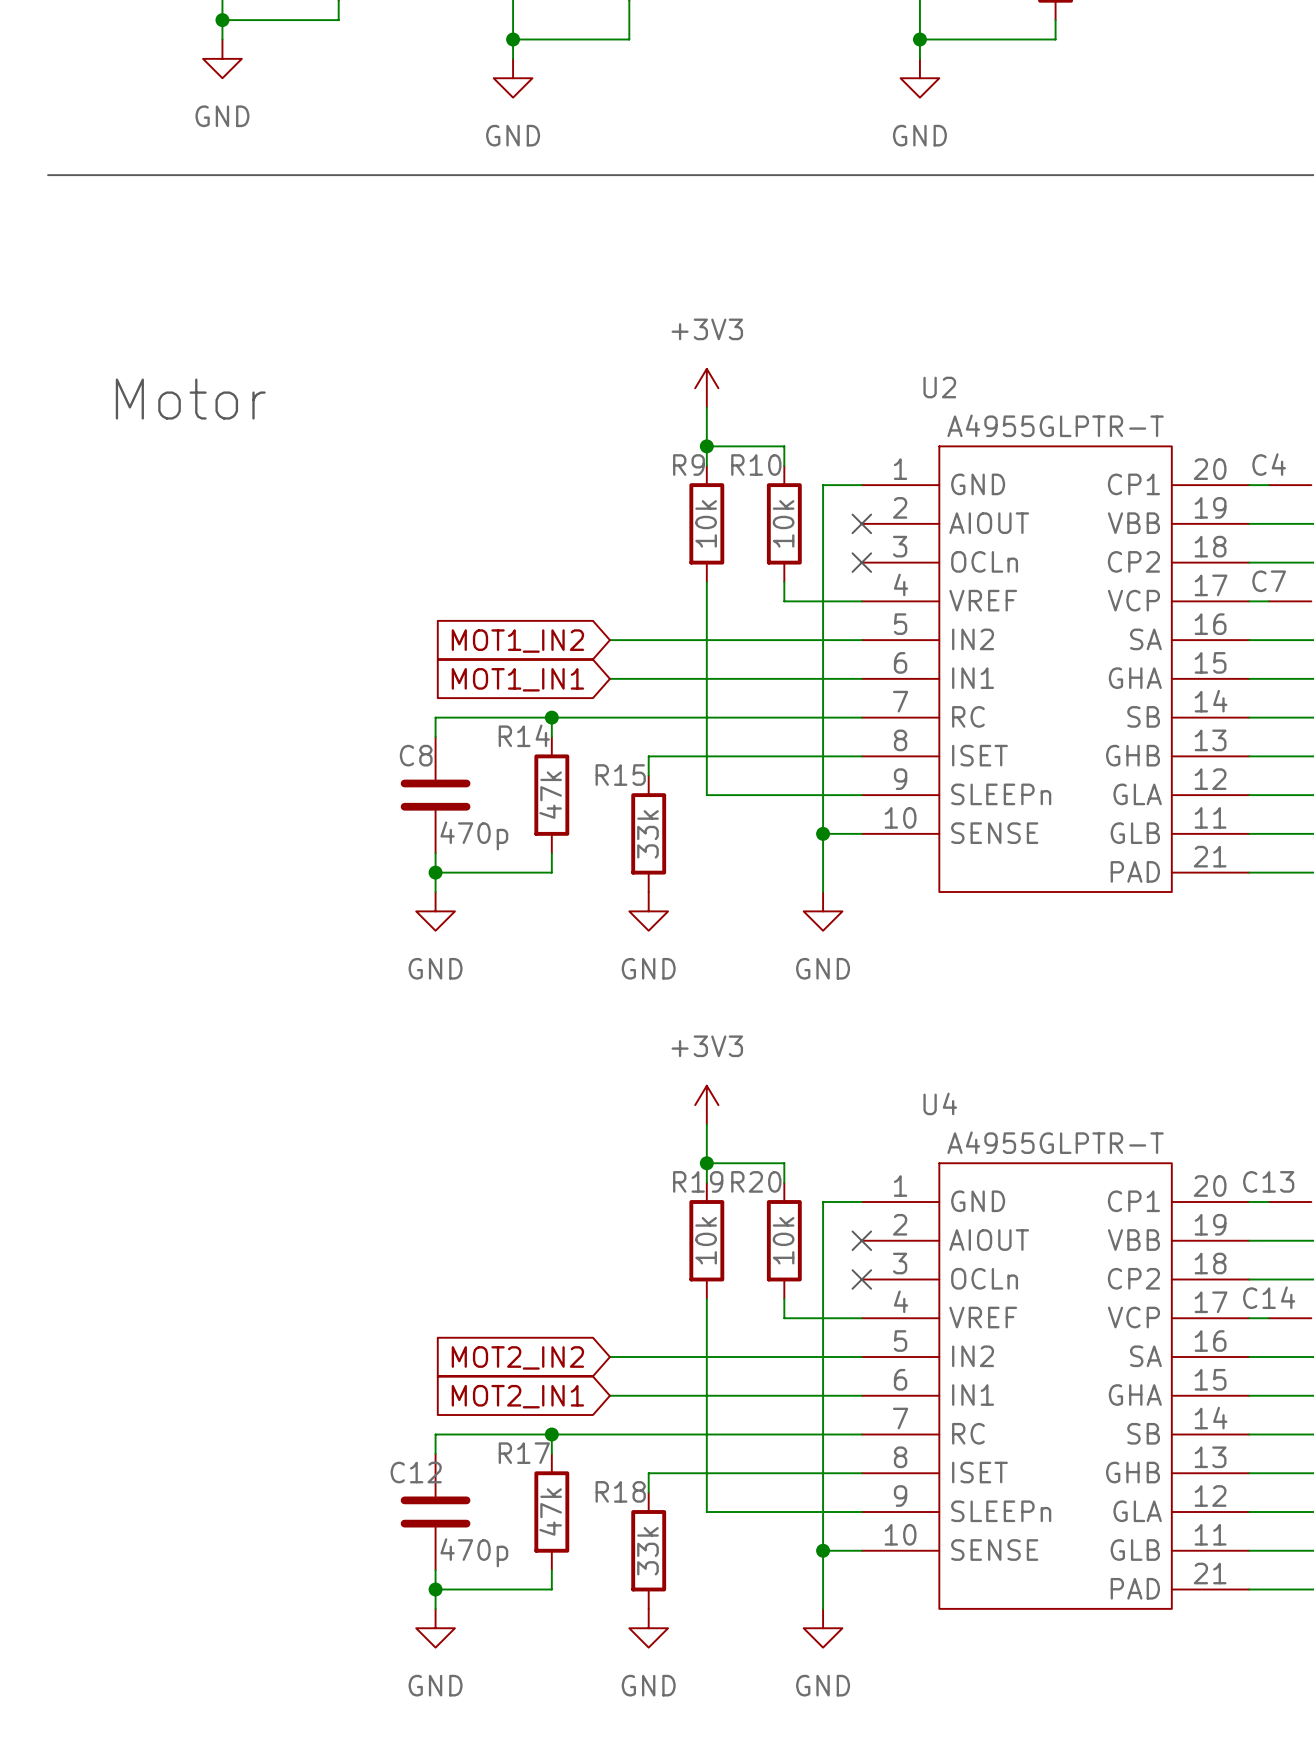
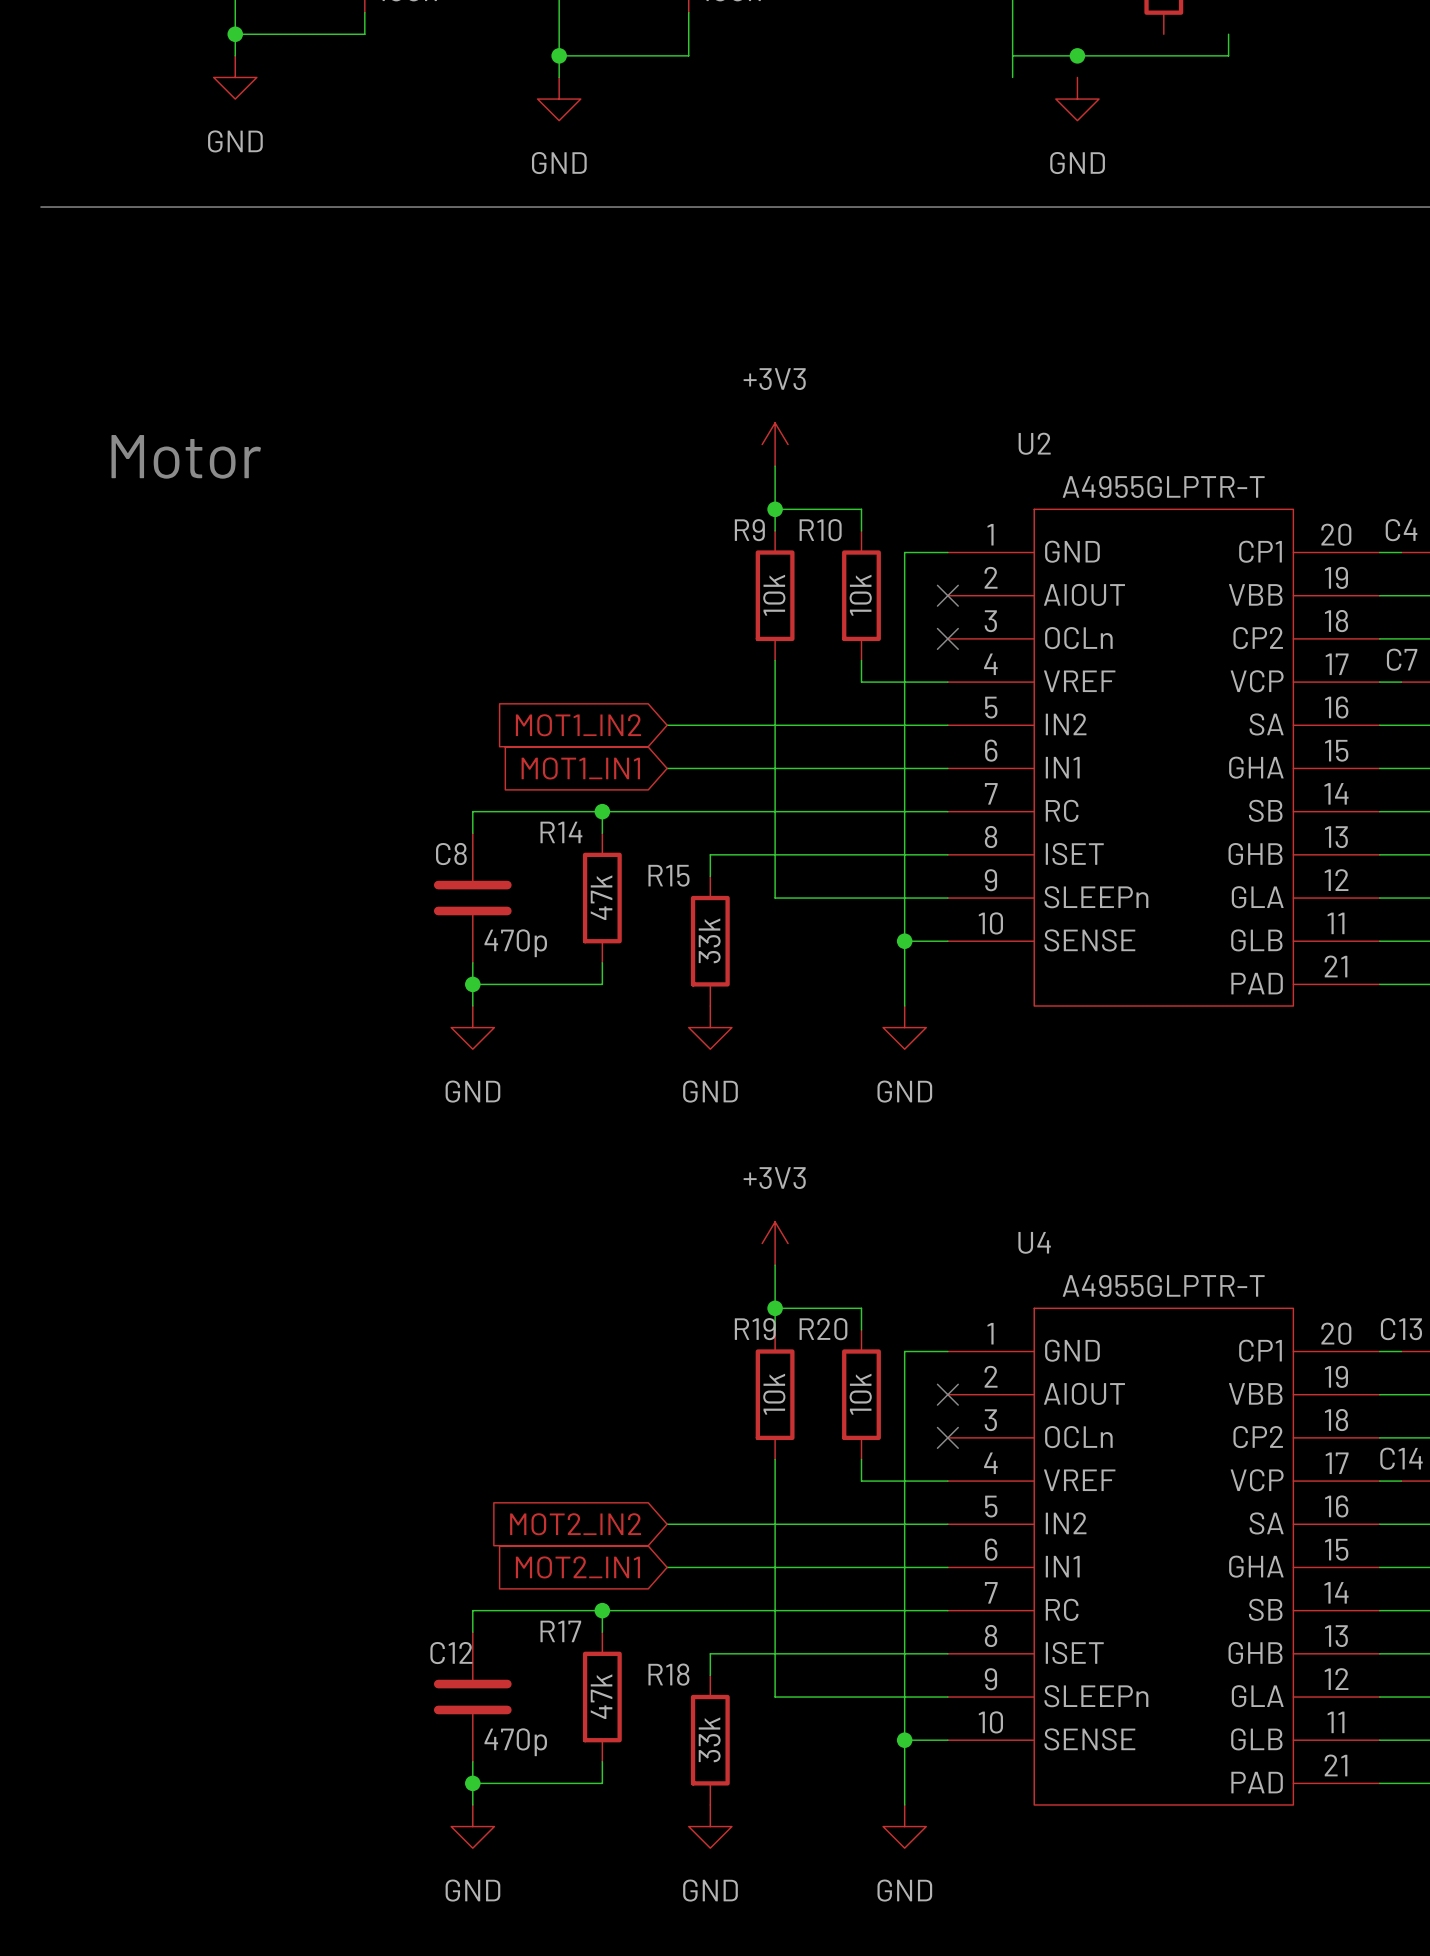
wire: (1055, 20) (1055, 39) -> (1228, 34) (1228, 55) (1163, 55)
junction position: (919, 39) -> (1077, 55)
power symbol position: GND (919, 78) -> GND (1077, 99)

